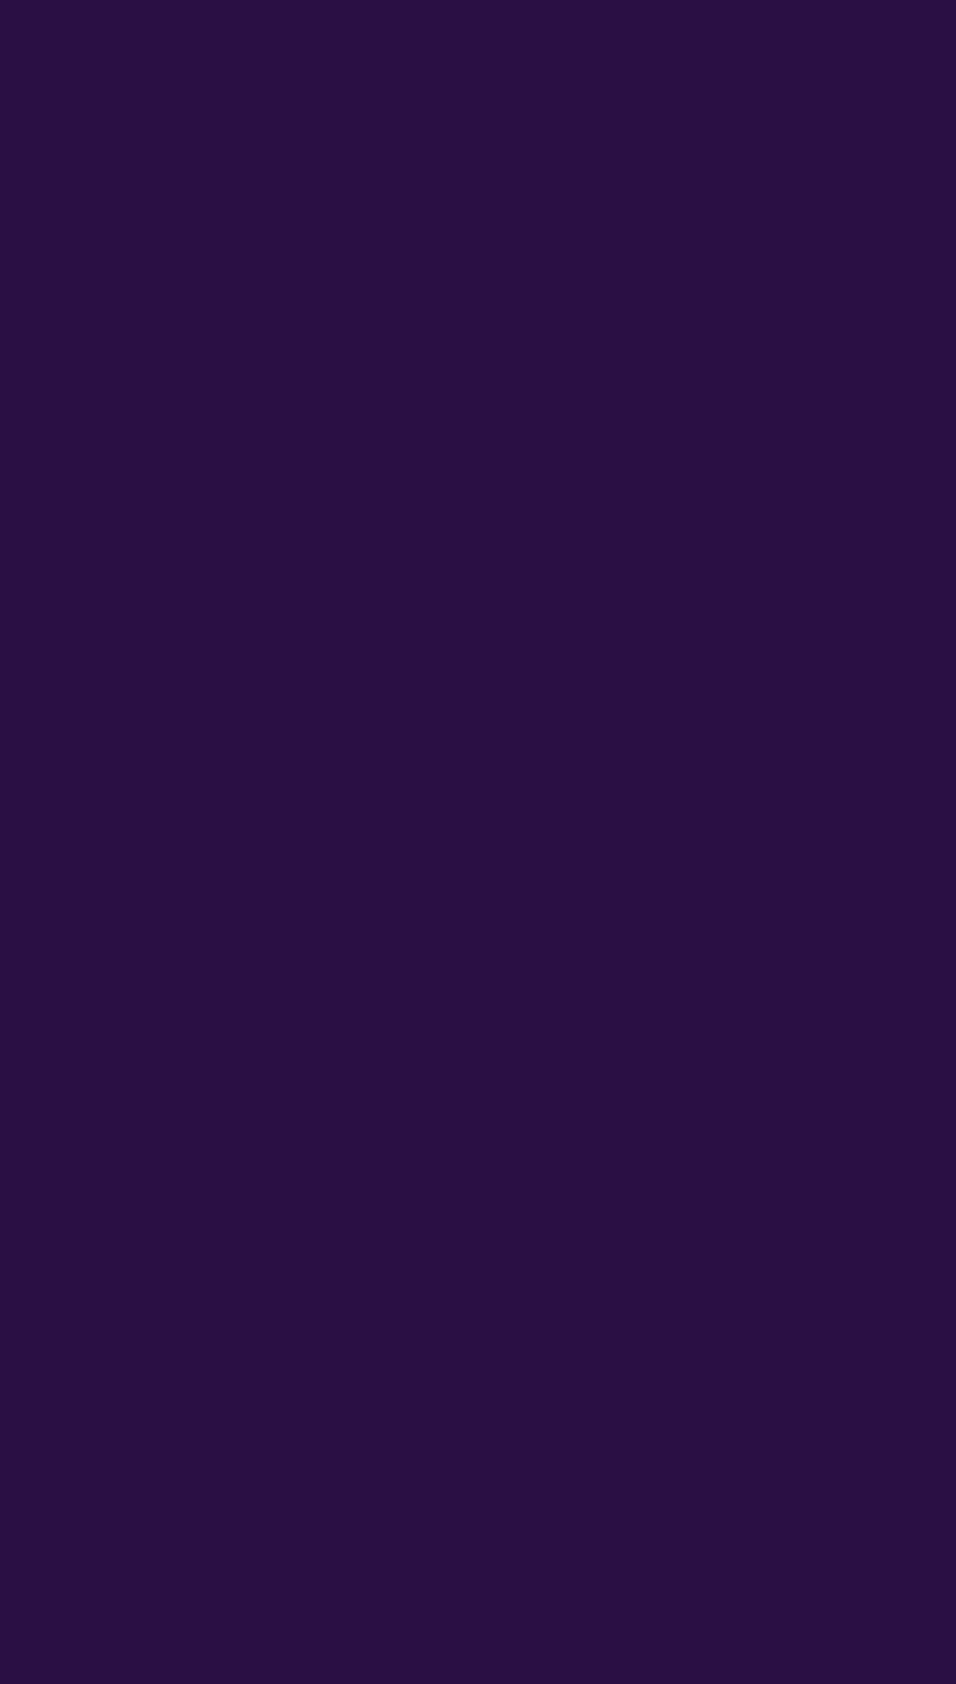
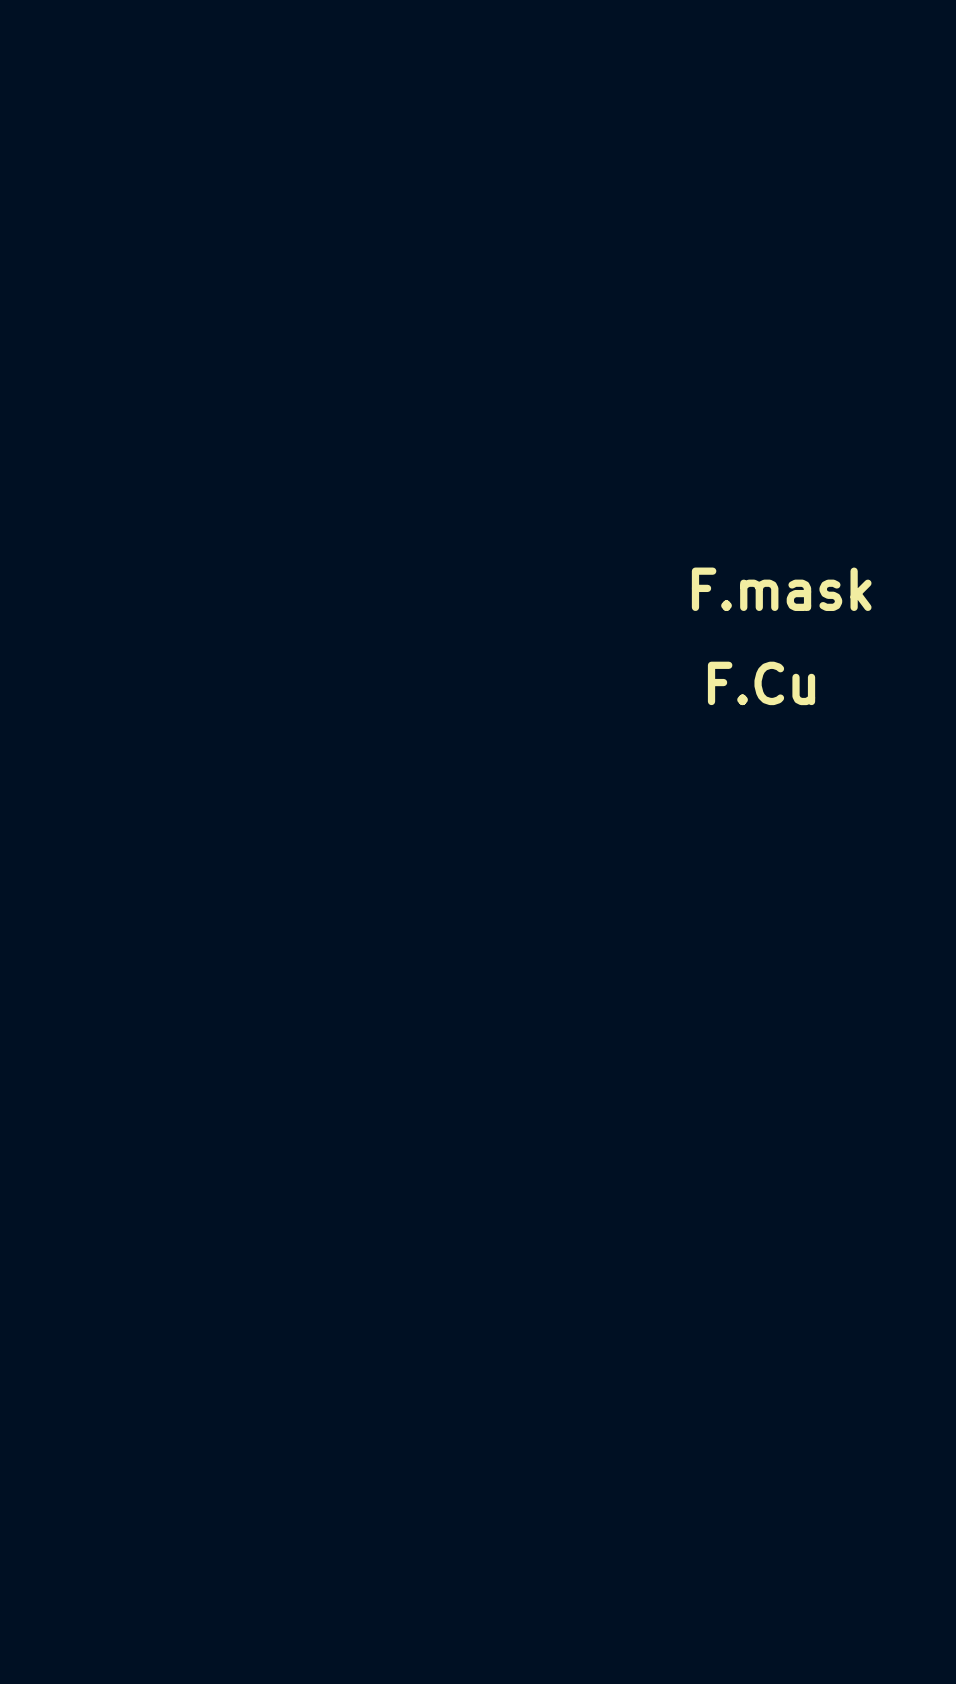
F.mask: none -> (781, 589)
F.Cu: none -> (761, 683)

